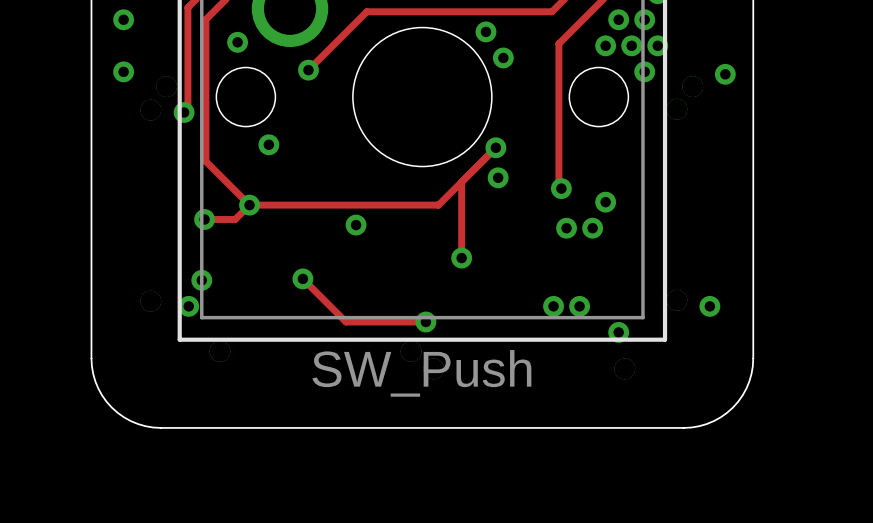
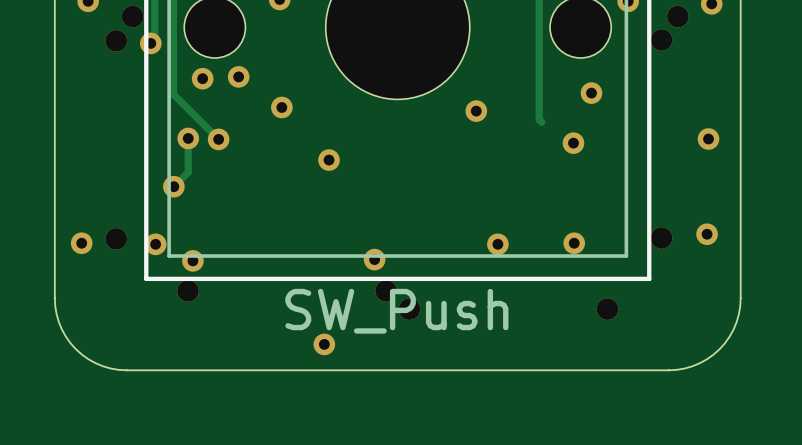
via: none -> (202, 78)
track: (495, 147) (438, 205) (249, 205) (235, 219) (204, 219) -> none
via: (495, 147) -> none
via: none -> (591, 93)
via: none -> (281, 107)
track: (461, 181) (461, 258) -> none
via: (561, 188) -> none
via: (605, 202) -> none
track: none -> (188, 138) (188, 172) (173, 186)
via: none -> (708, 139)
via: none -> (573, 143)
via position: (204, 219) -> (188, 138)
via: (566, 228) -> none
via: (592, 228) -> none
via: none -> (173, 186)
via: (461, 258) -> none
track: (302, 278) (345, 321) (425, 321) -> none
via: (302, 278) -> none
via: (201, 280) -> none
via: none -> (81, 243)
via: none -> (497, 244)
via: (553, 306) -> none
via position: (579, 306) -> (574, 243)
via position: (709, 306) -> (707, 234)
via position: (425, 321) -> (374, 259)
via: none -> (192, 260)
via: (618, 332) -> none
via: none -> (324, 344)

